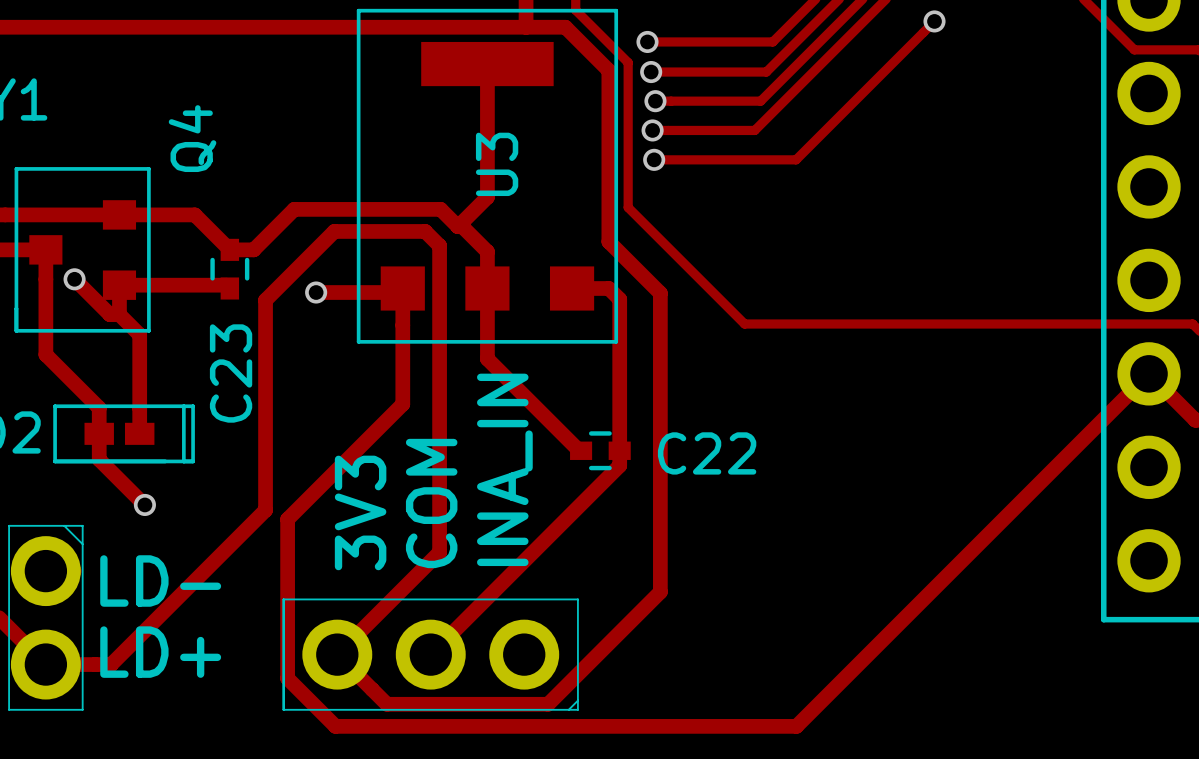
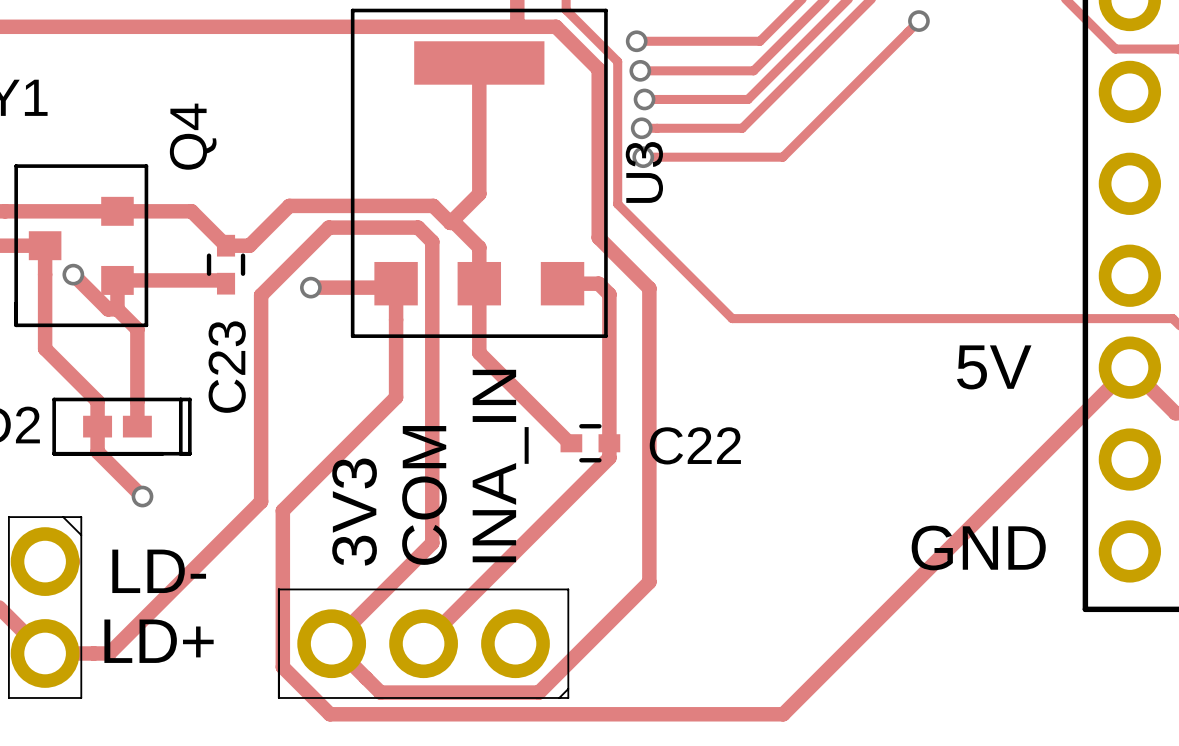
U3 name position: U3 (497, 164) -> U3 (644, 172)
text: none -> 5V (994, 367)
text: none -> GND (978, 548)

